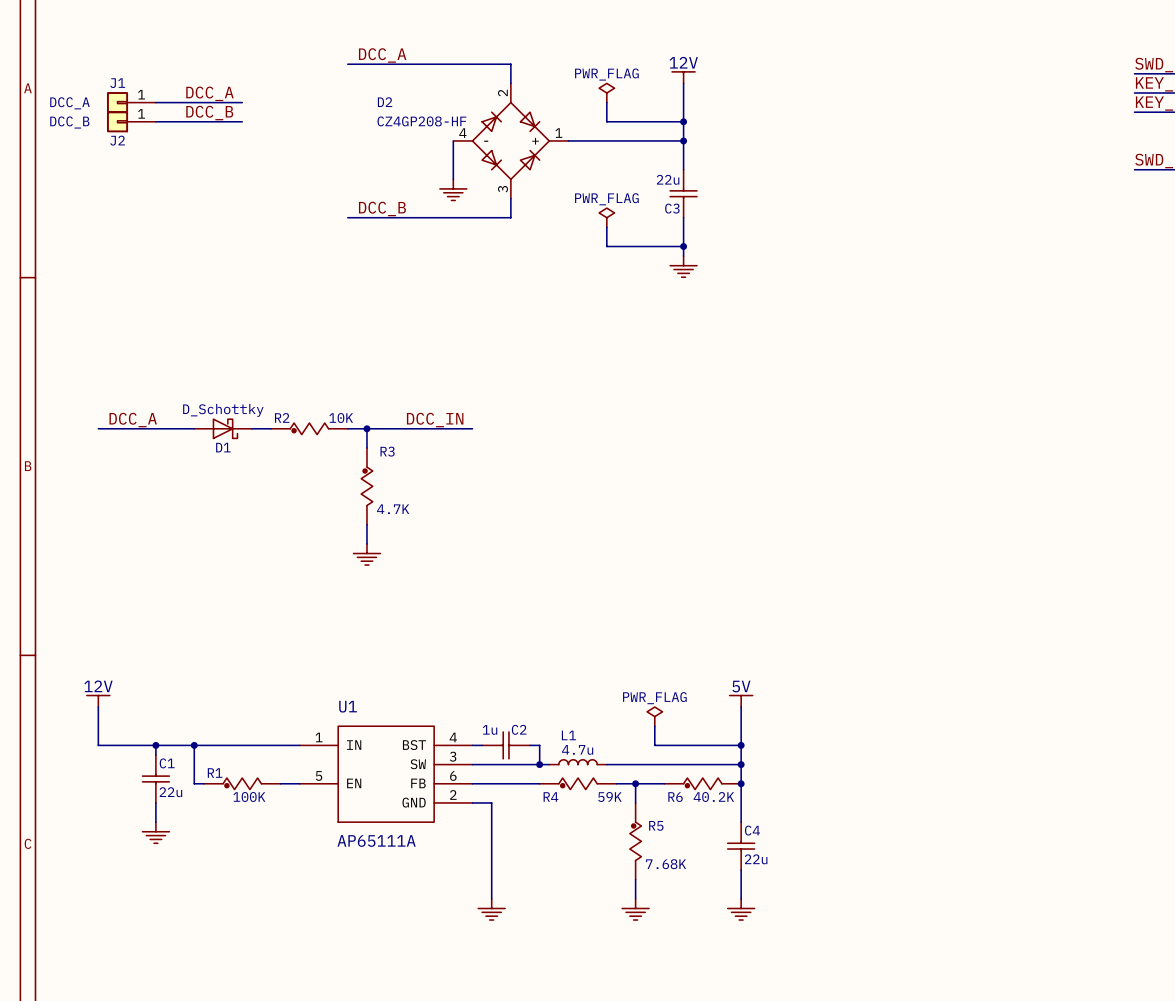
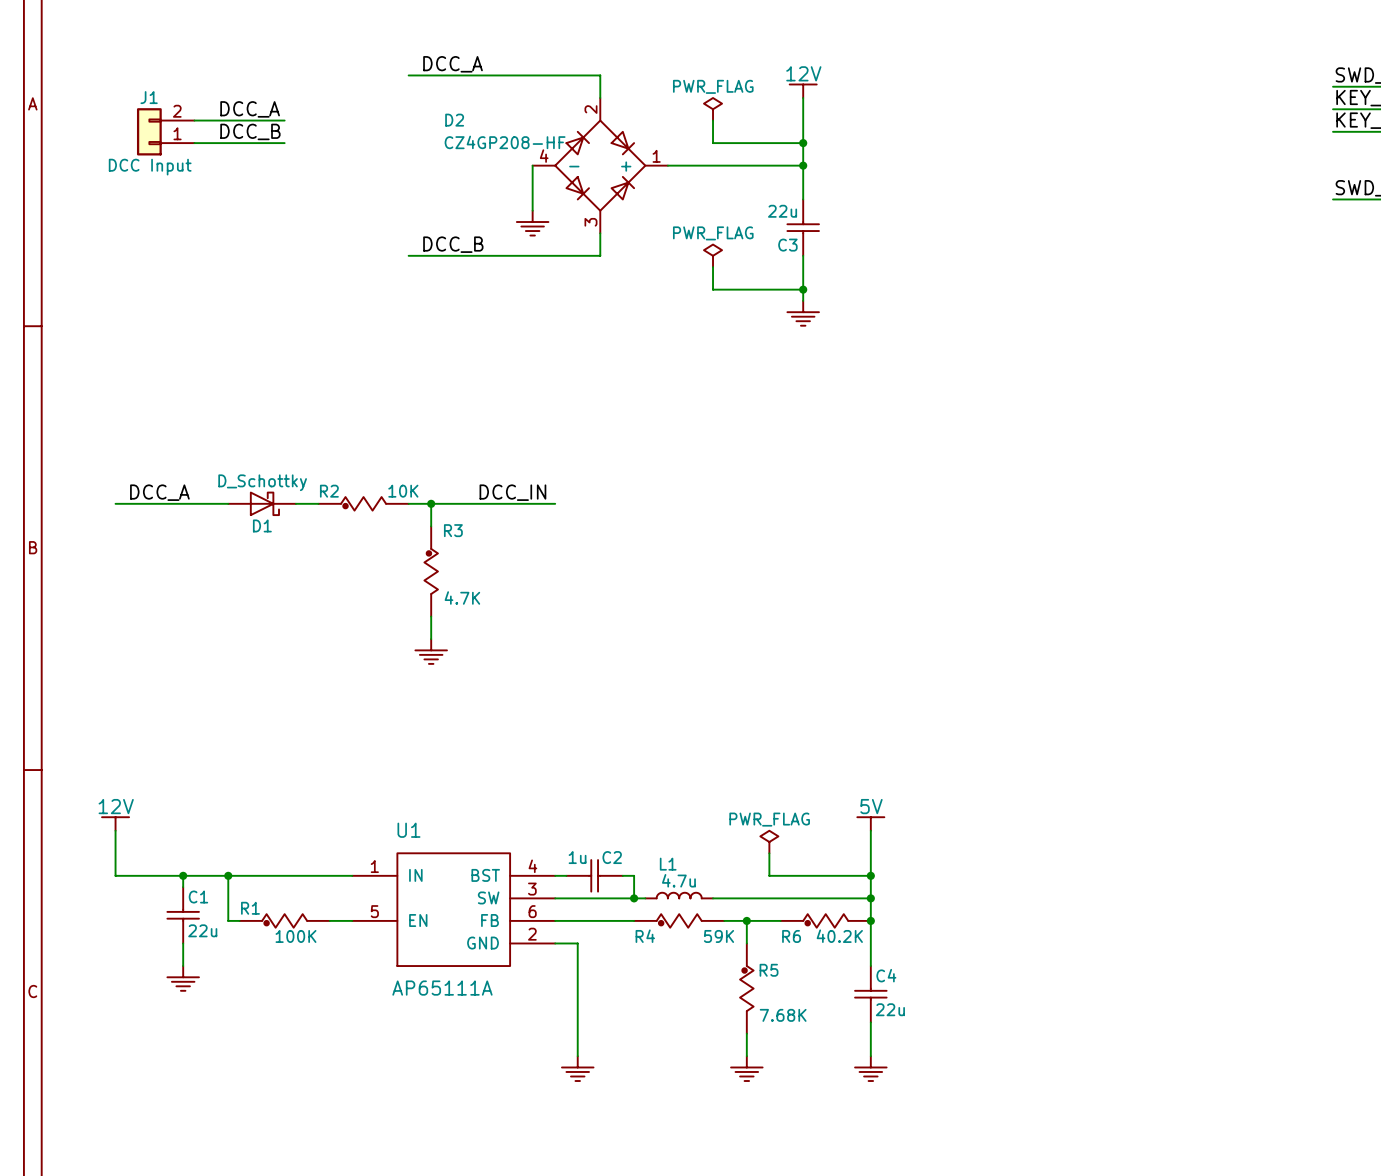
J1 symbol: [106, 92, 156, 114] -> [136, 108, 195, 156]
J1 value: DCC_A (70, 103) -> DCC Input (150, 167)
J2: DCC_B (131, 121) -> none

